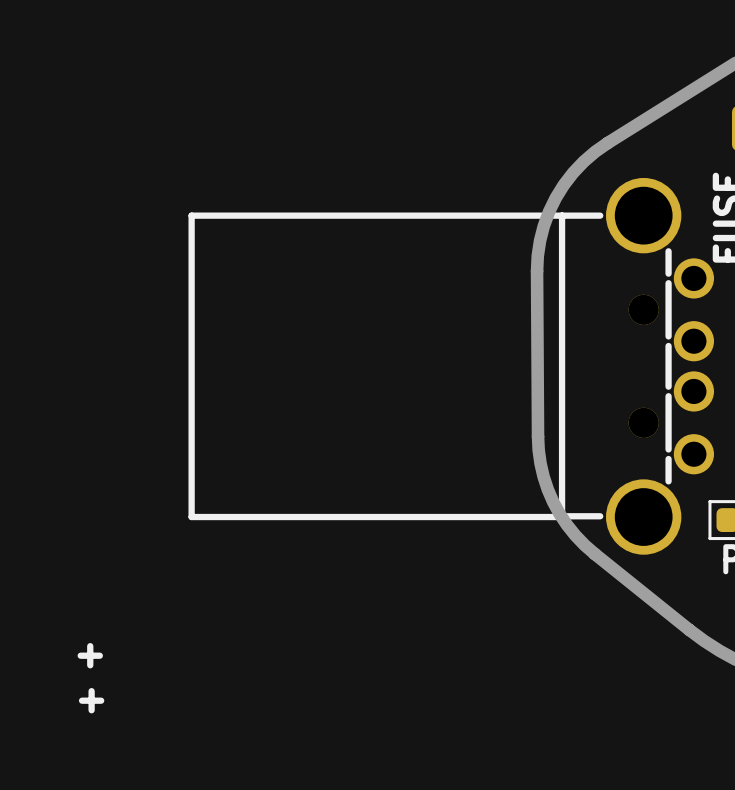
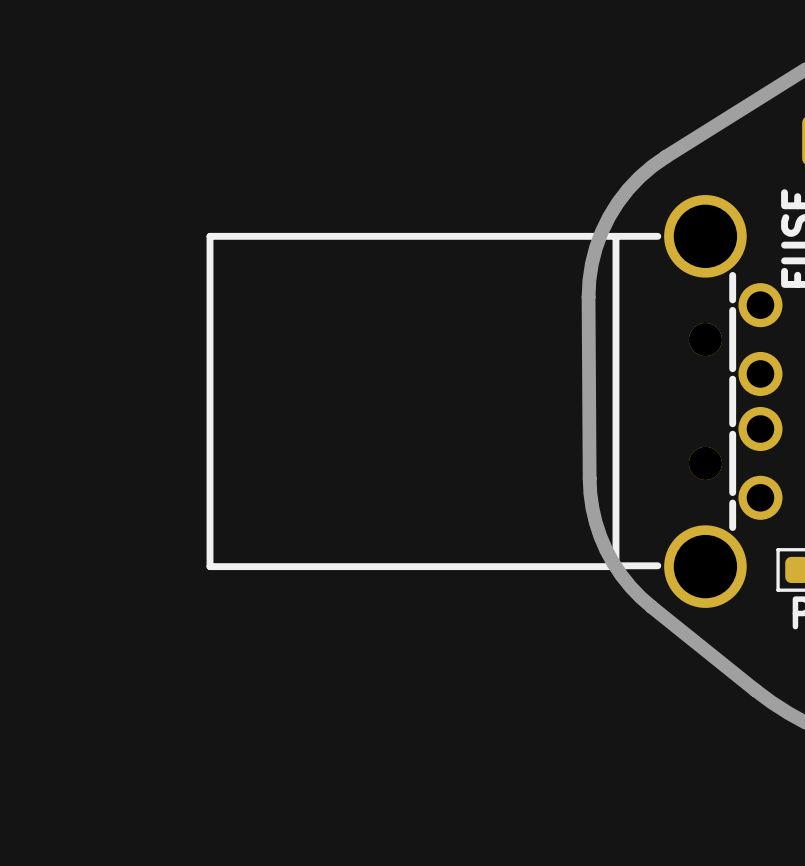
text: + (90, 655) -> none
text: + (91, 700) -> none

